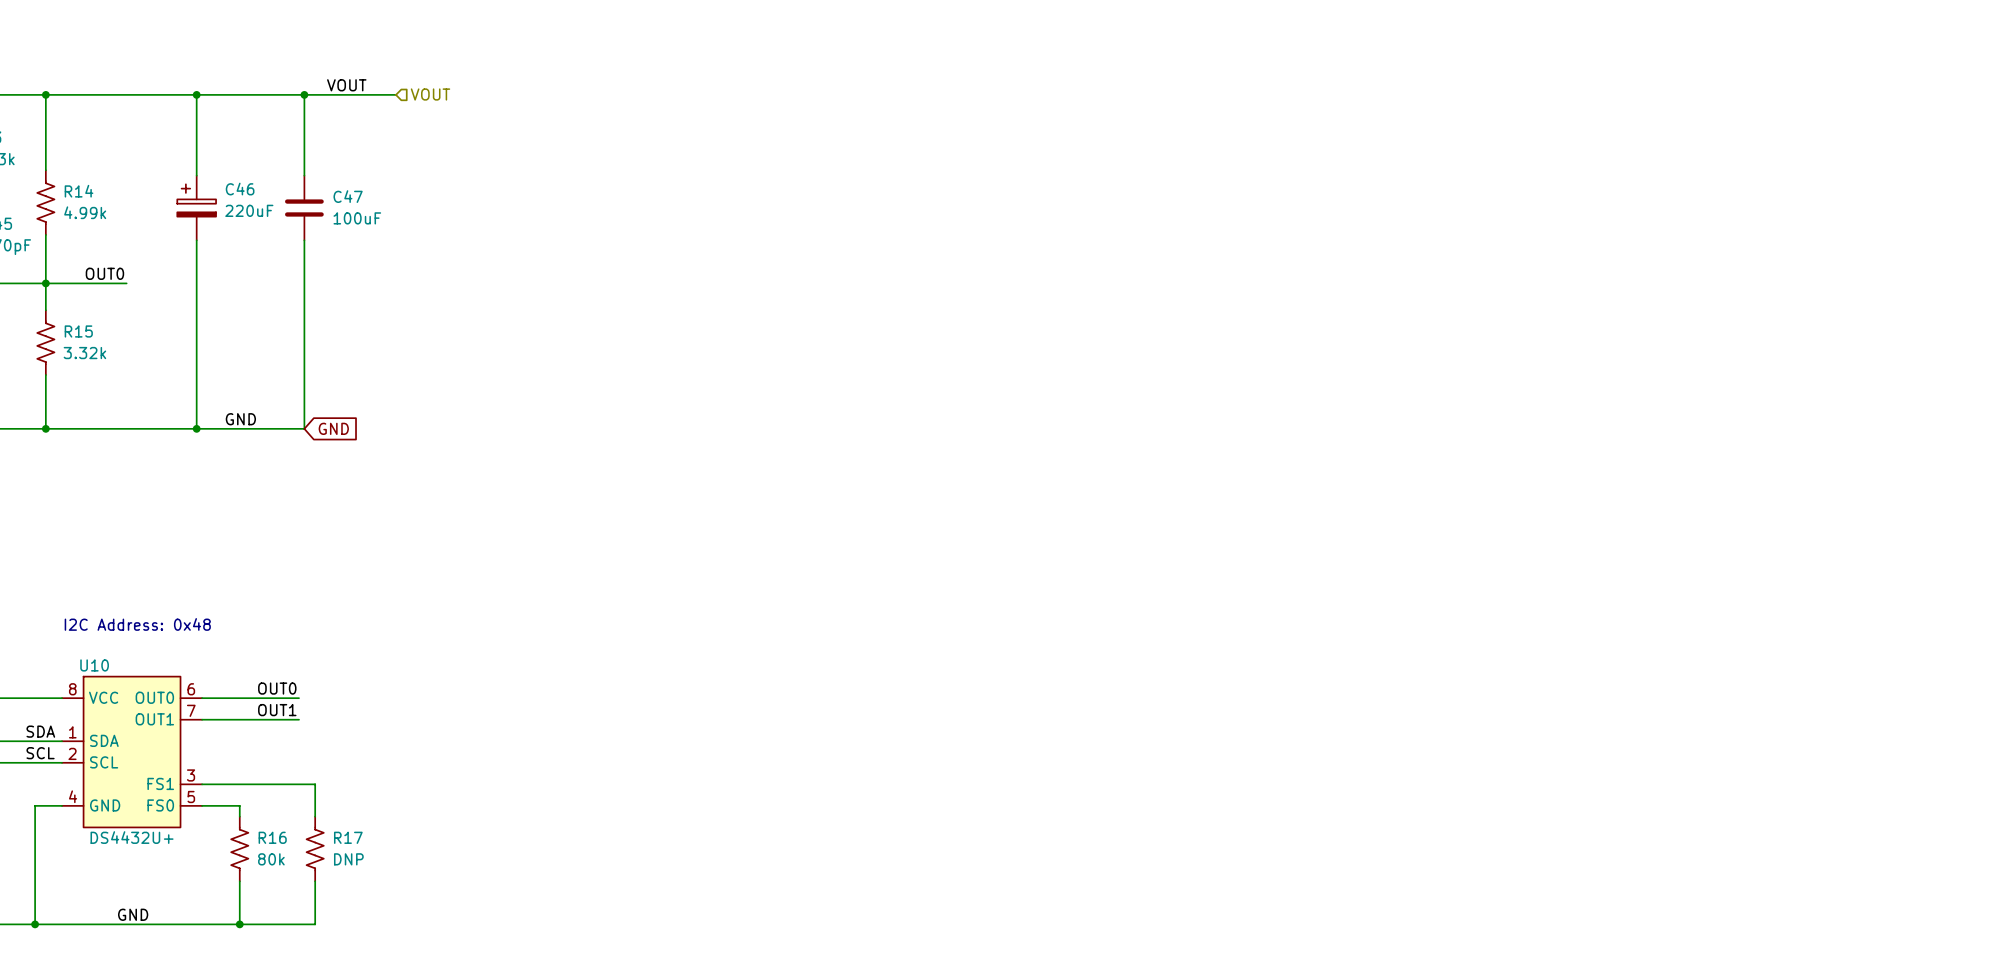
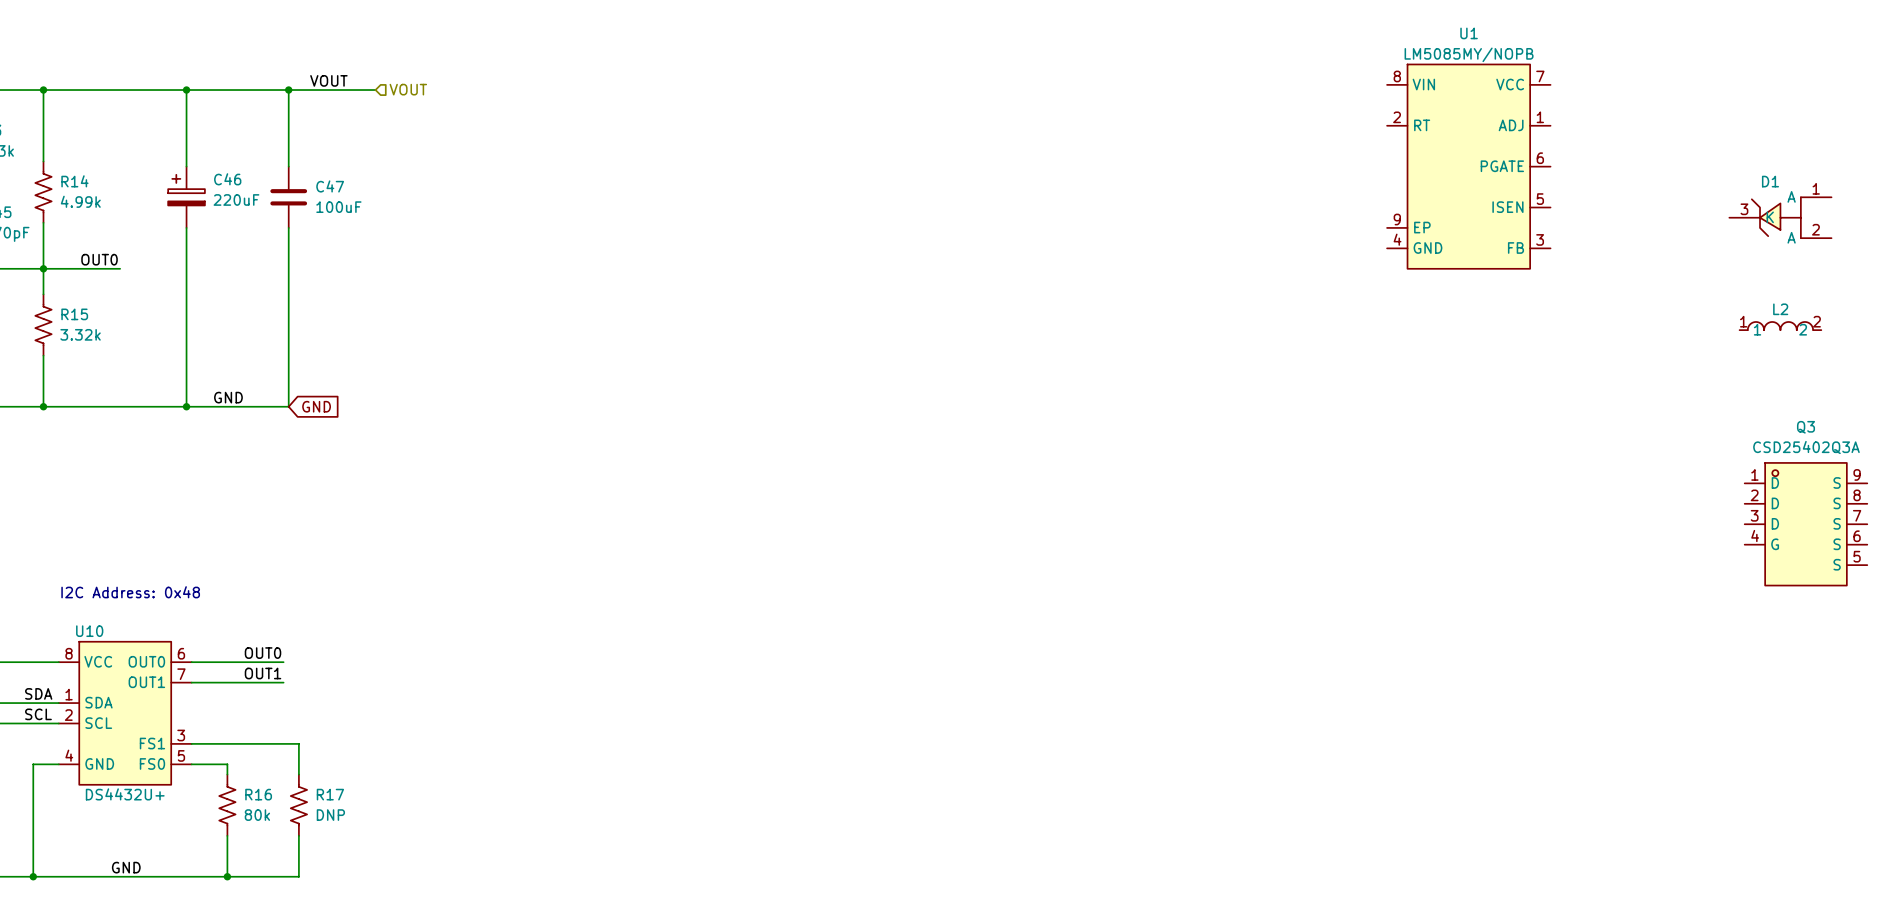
U1: none -> LM5085MY/NOPB (1468, 166)
D1: none -> (1780, 217)
L2: none -> (1780, 326)
Q3: none -> CSD25402Q3A (1805, 524)

